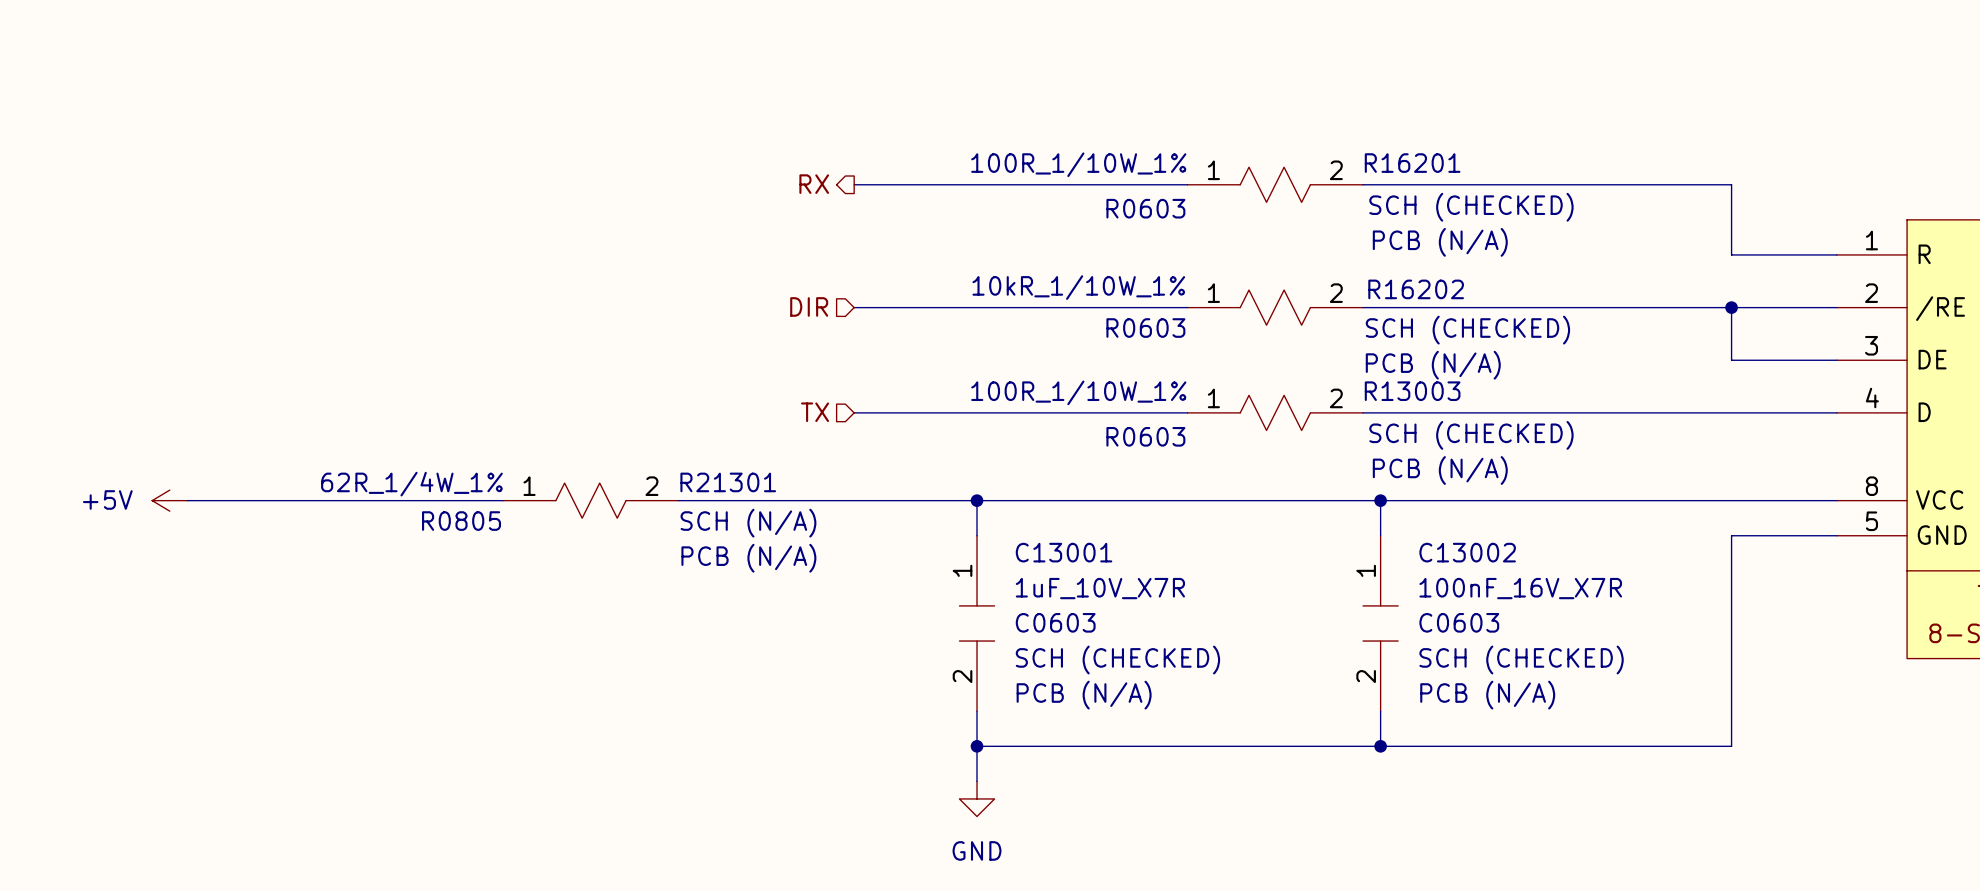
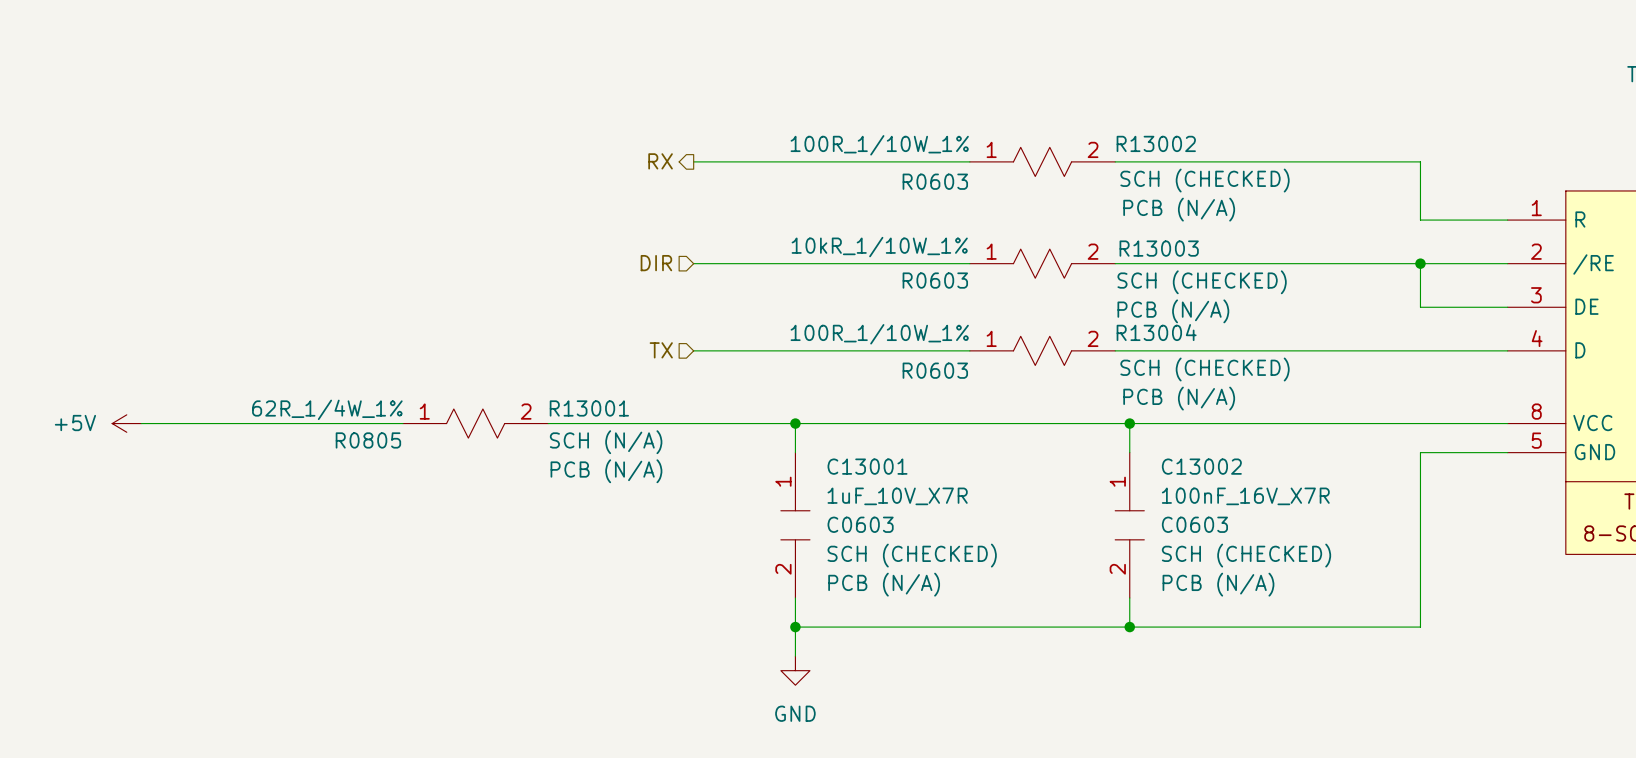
R16201 name: R16201 (1412, 163) -> R13002 (1156, 143)
R16202 name: R16202 (1416, 289) -> R13003 (1159, 248)
R13003 name: R13003 (1412, 391) -> R13004 (1156, 332)
R21301 name: R21301 (728, 482) -> R13001 (589, 408)

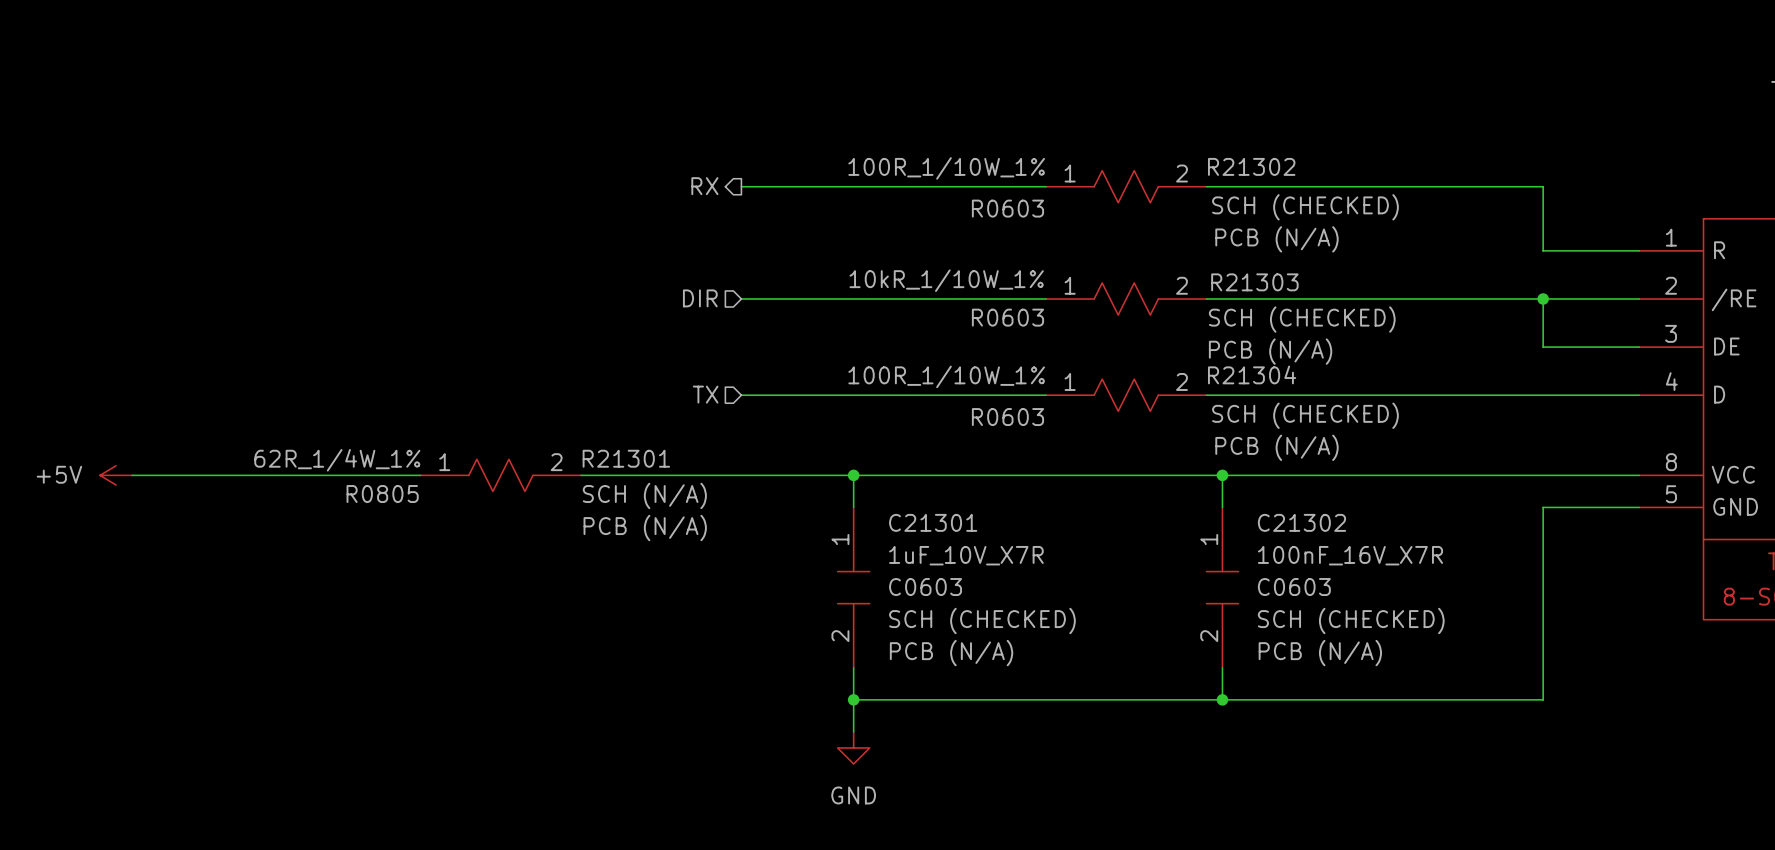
R13002 name: R13002 (1156, 143) -> R21302 (1251, 166)
R13003 name: R13003 (1159, 248) -> R21303 (1254, 282)
R13004 name: R13004 (1156, 332) -> R21304 (1252, 374)
R13001 name: R13001 (589, 408) -> R21301 (626, 458)
C13001 name: C13001 (867, 466) -> C21301 (933, 522)
C13002 name: C13002 (1201, 466) -> C21302 (1301, 522)

